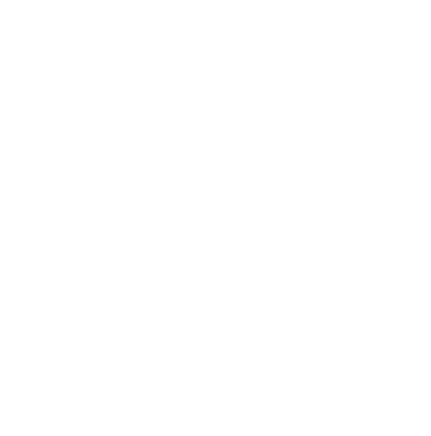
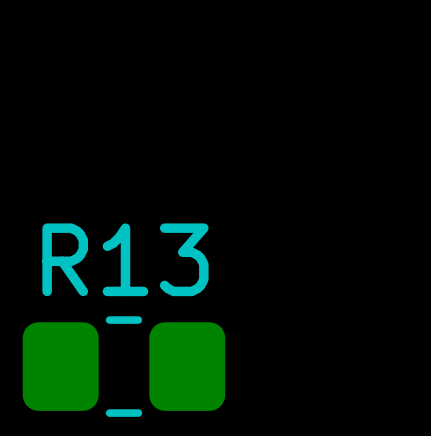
R13: none -> (123, 366)

